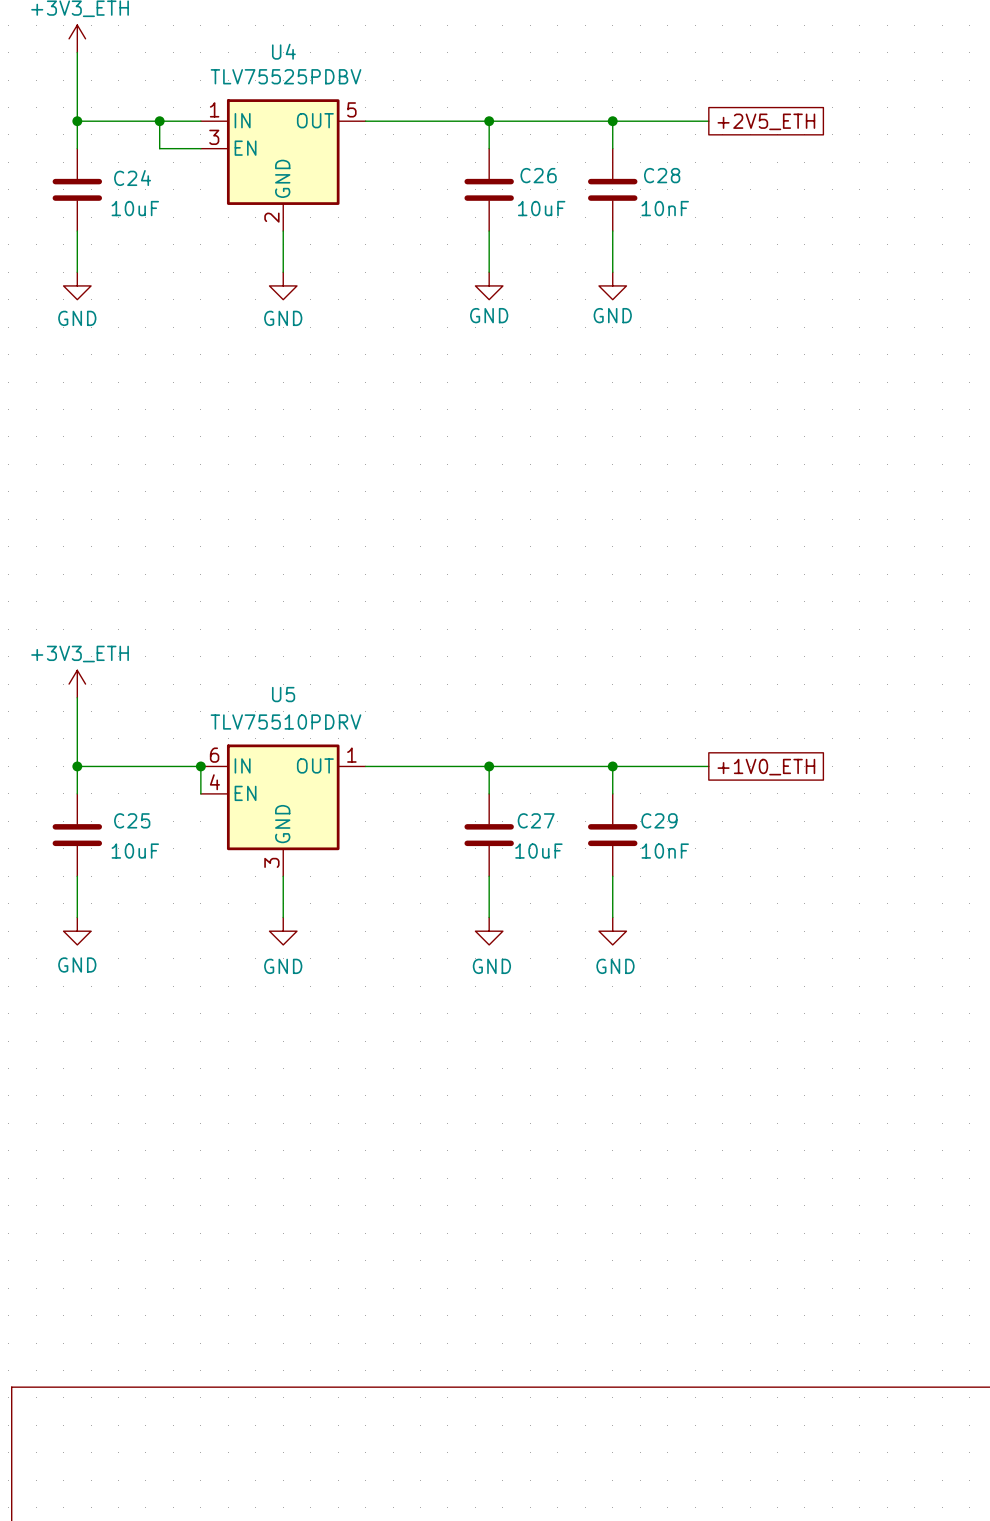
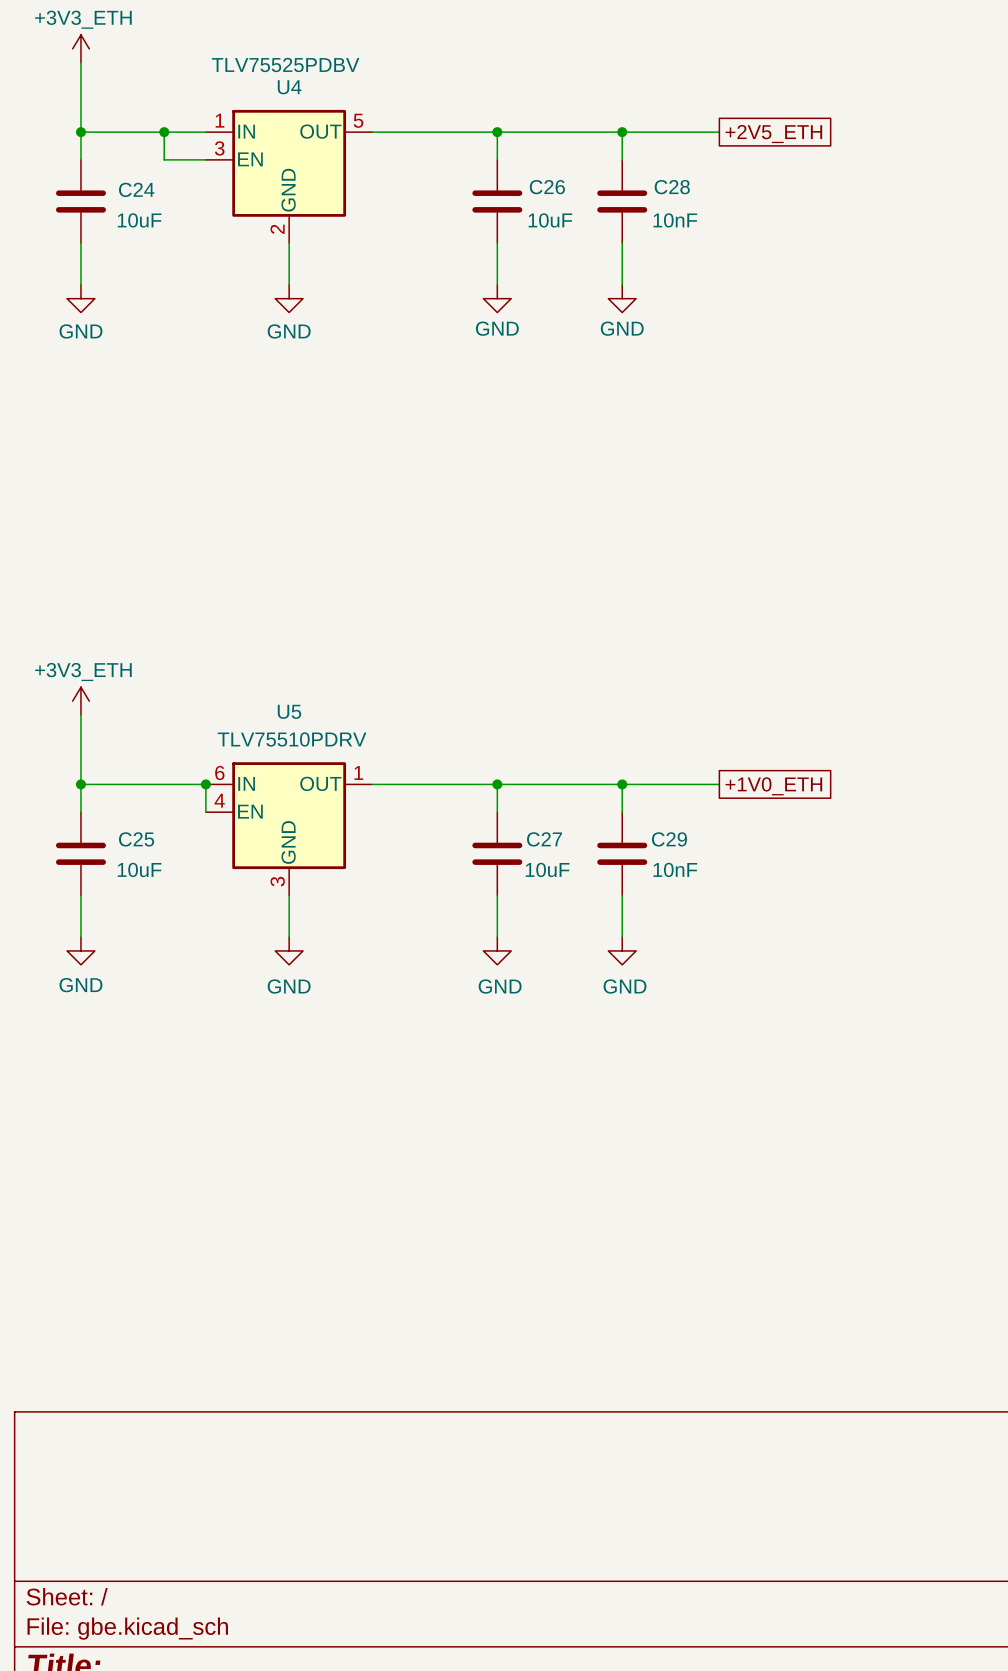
U4 name position: U4 (283, 51) -> U4 (289, 87)
U4 value position: TLV75525PDBV (286, 76) -> TLV75525PDBV (285, 64)

